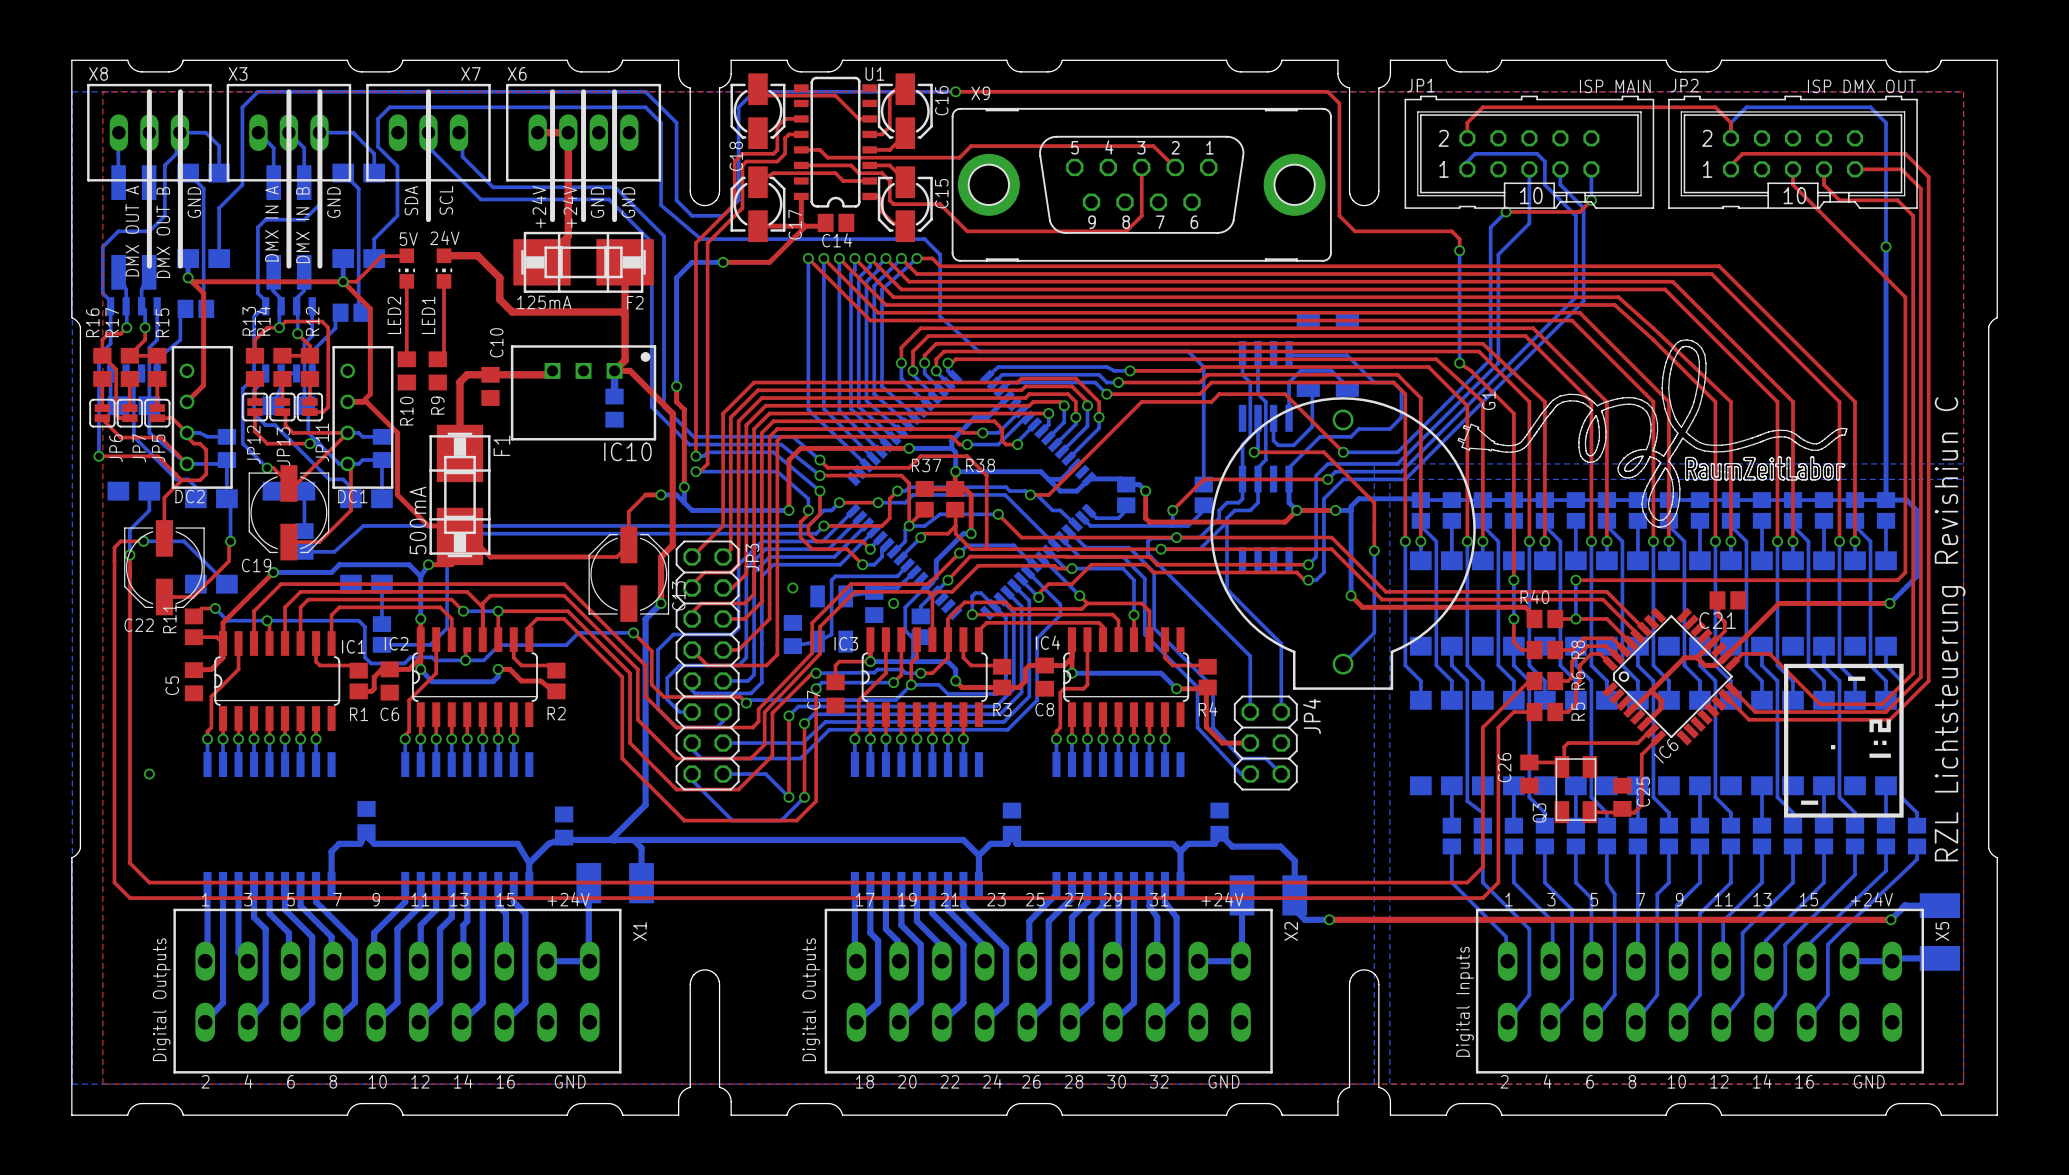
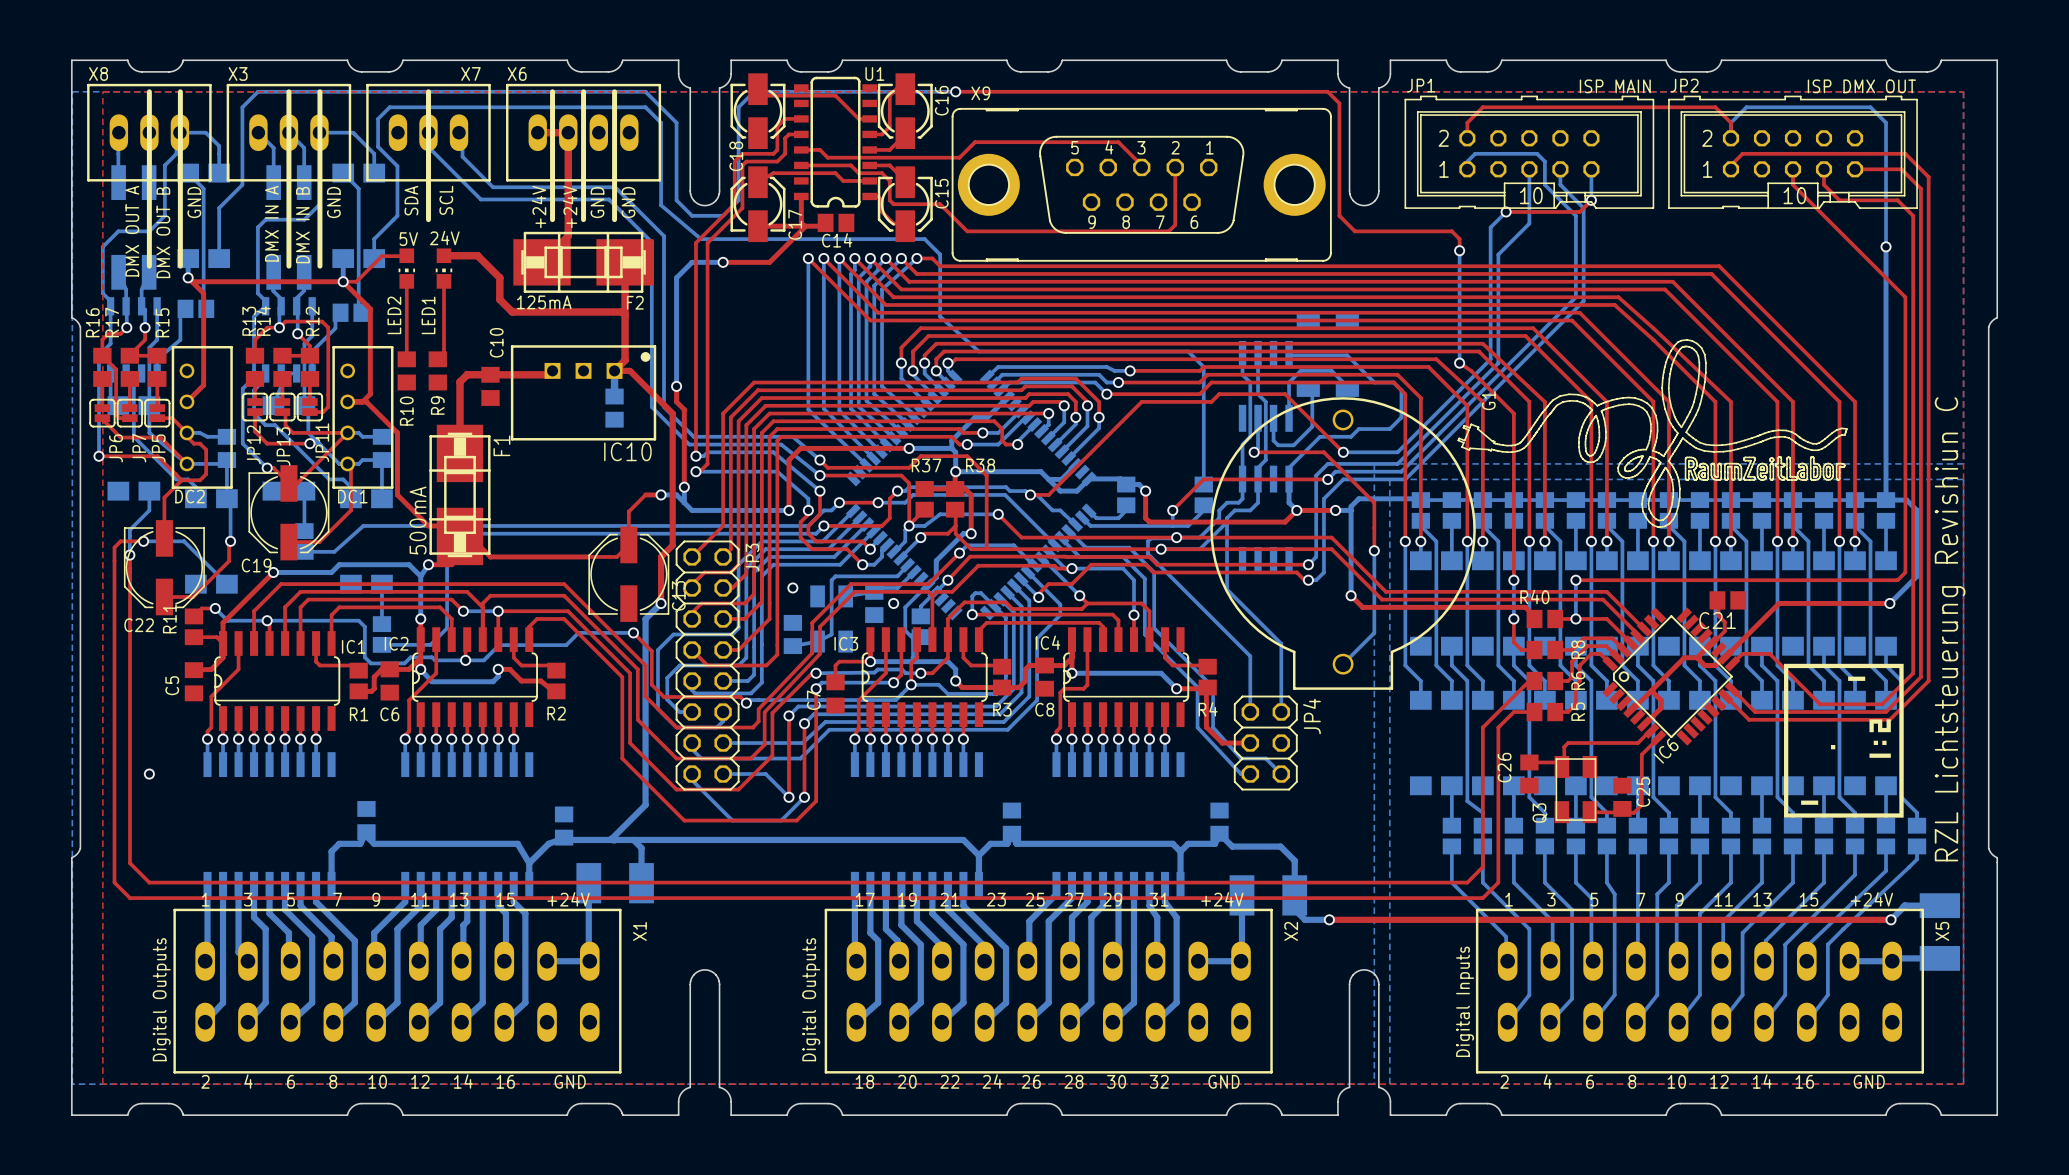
top track: (971, 146) (1153, 146) (1175, 167) -> (971, 146) (975, 142) (1118, 142) (1141, 167)
top track: (1141, 167) (1141, 215) (1126, 231) -> (1175, 167) (1175, 224) (1168, 231) (1126, 231)

